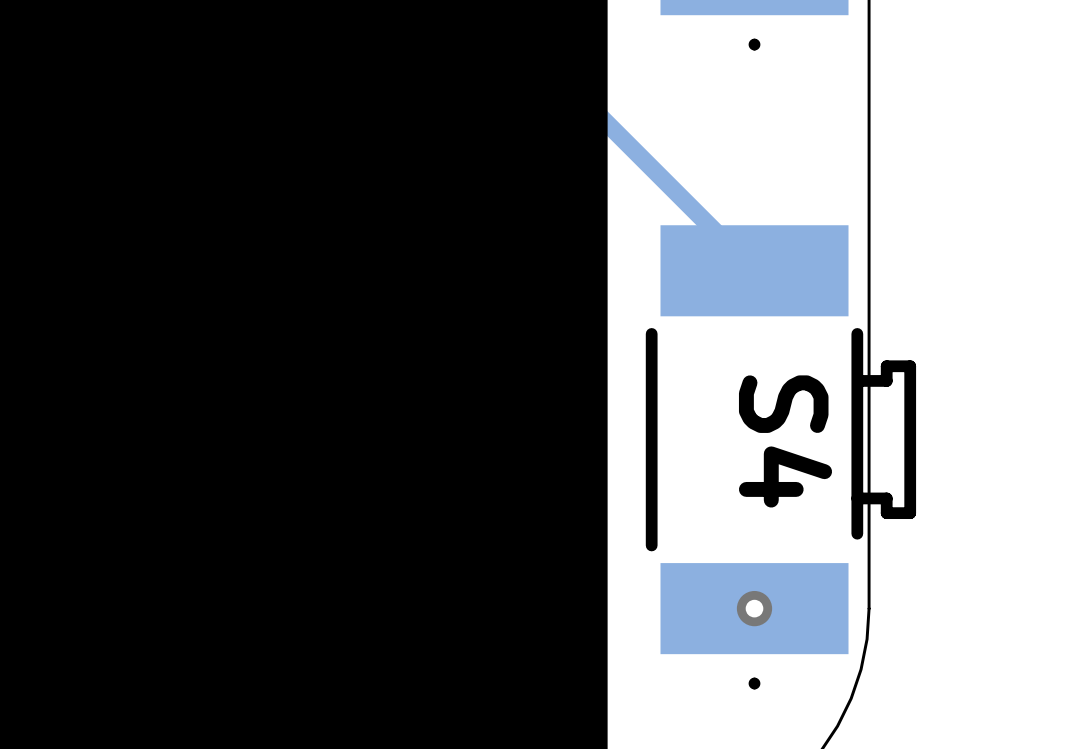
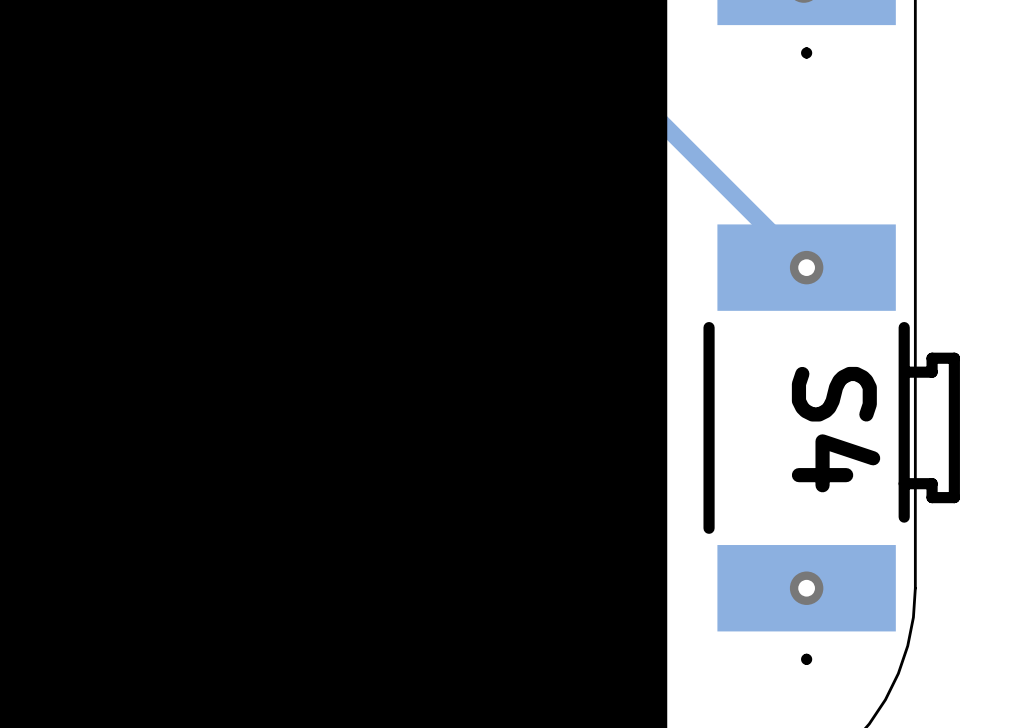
via: none -> (806, 267)

